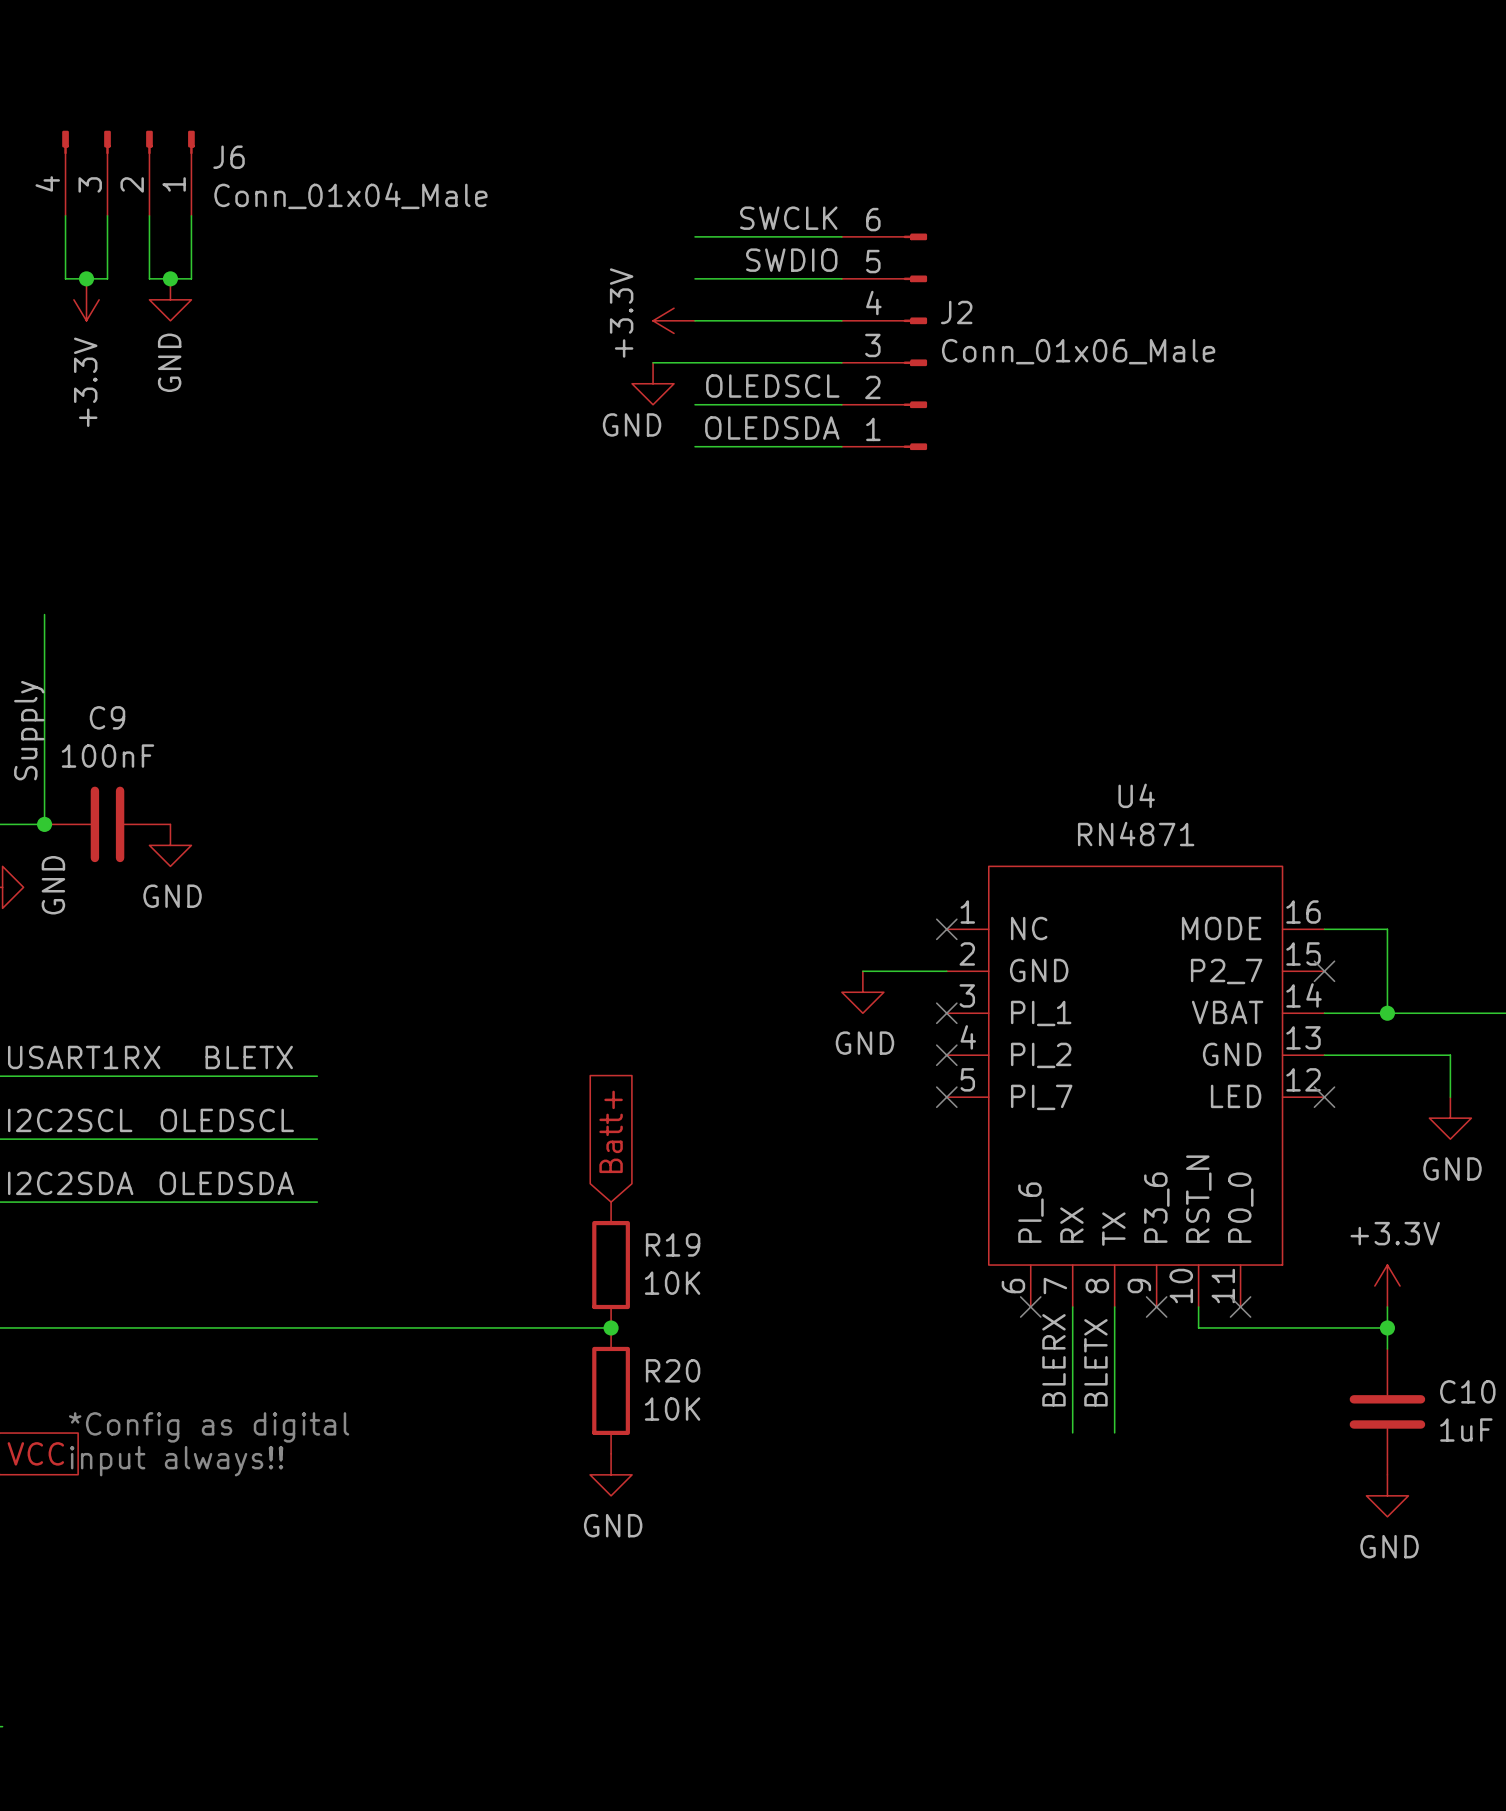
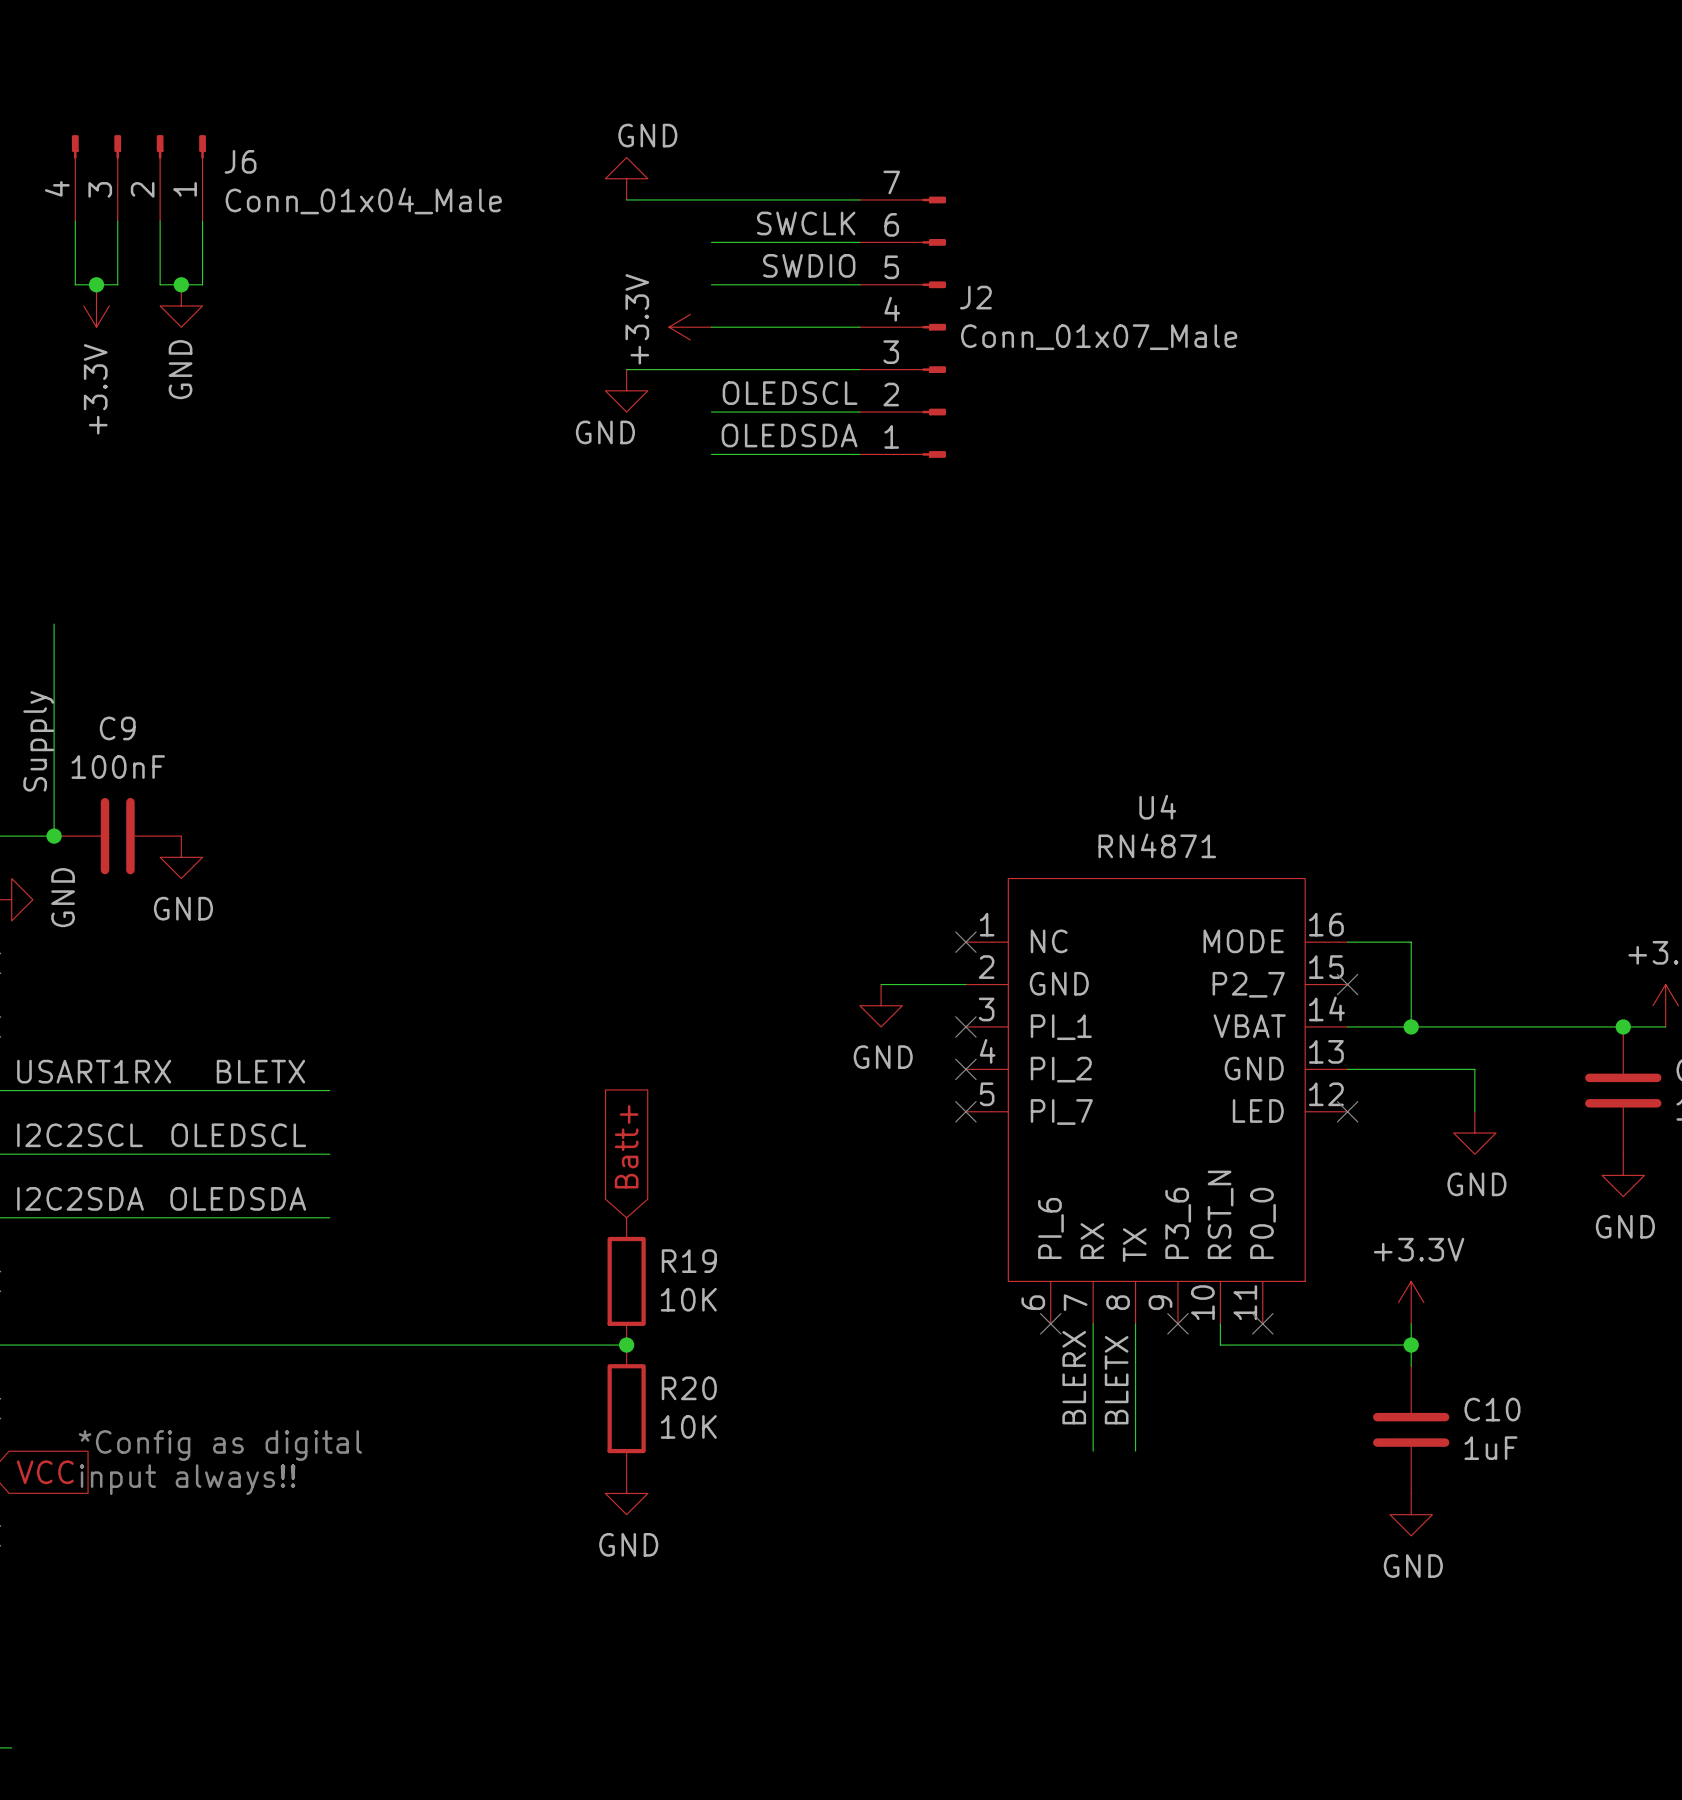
power symbol: none -> GND (626, 178)
wire: none -> (626, 199) (859, 199)
J2 symbol: [841, 233, 928, 451] -> [859, 196, 946, 458]
J2 value: Conn_01x06_Male (1078, 351) -> Conn_01x07_Male (1099, 337)
wire: none -> (626, 369) (669, 369)
power symbol position: GND (653, 383) -> GND (626, 390)

